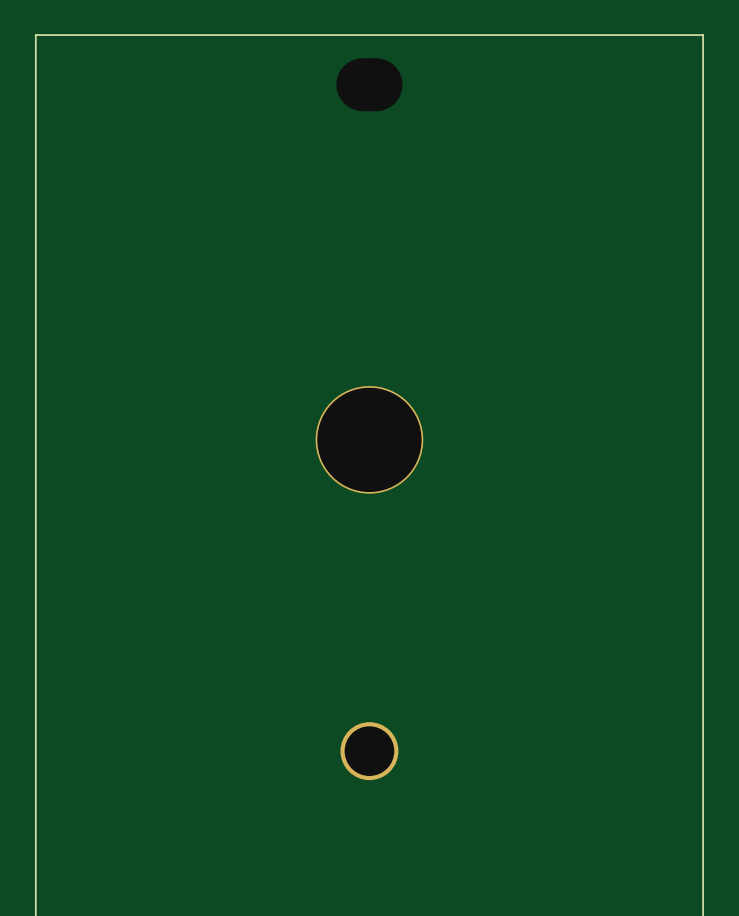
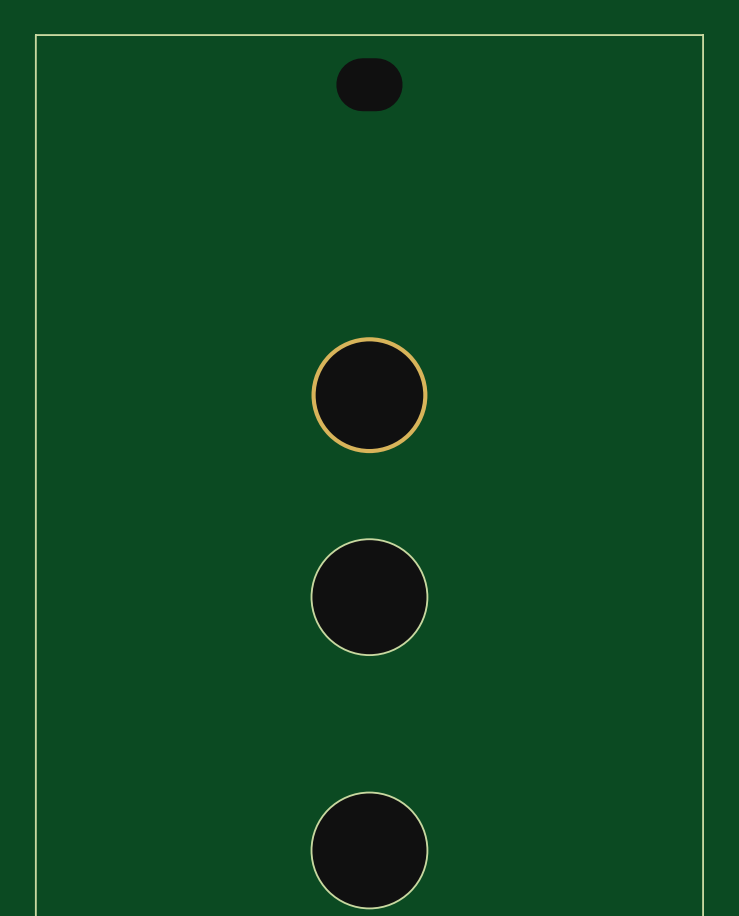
part: none -> (369, 395)
part: (369, 439) -> none
part: none -> (369, 597)
part: (369, 751) -> none
part: none -> (369, 850)

